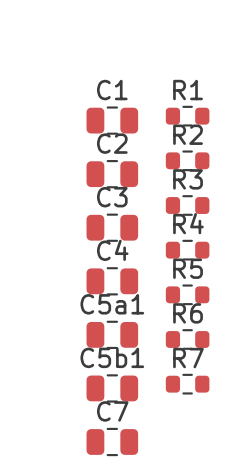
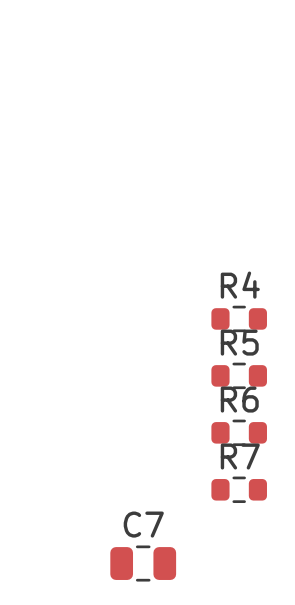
R1: (187, 116) -> none
C1: (112, 120) -> none
R2: (187, 160) -> none
C2: (112, 174) -> none
R3: (187, 205) -> none
C3: (112, 227) -> none
C4: (112, 281) -> none
C5a1: (112, 334) -> none
C5b1: (112, 388) -> none

